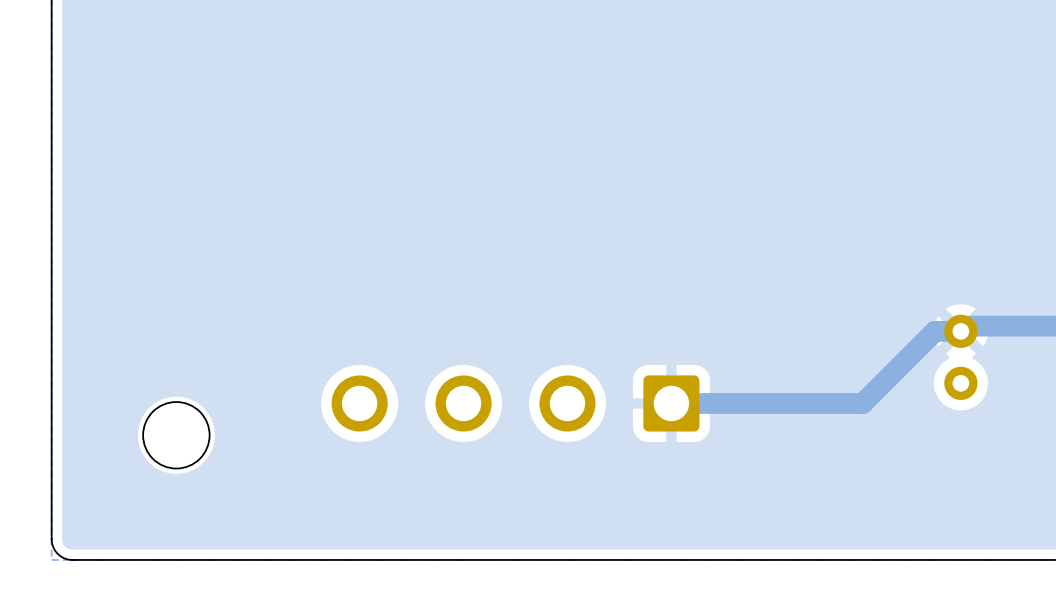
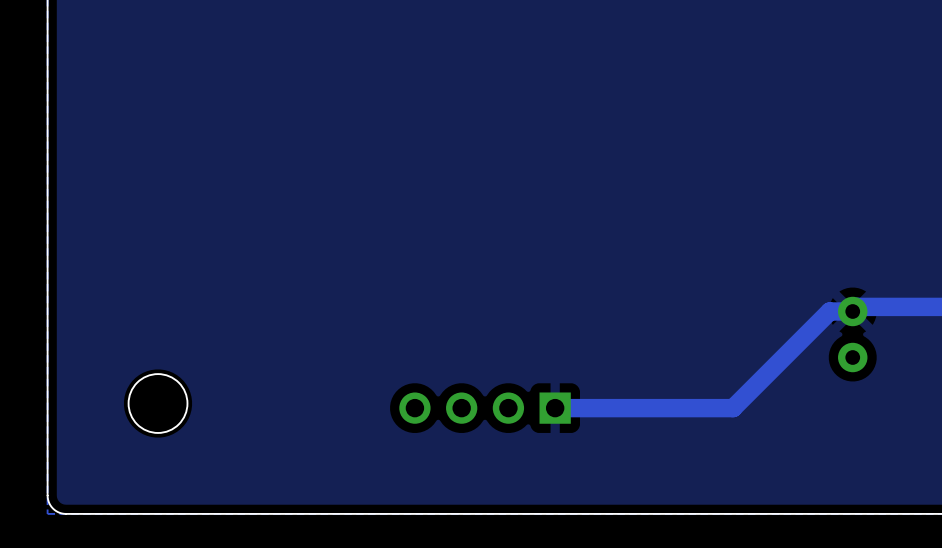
part: (515, 403) -> none
track: (862, 403) (671, 403) -> (765, 375) (733, 408) (555, 408)
part: none -> (485, 408)

